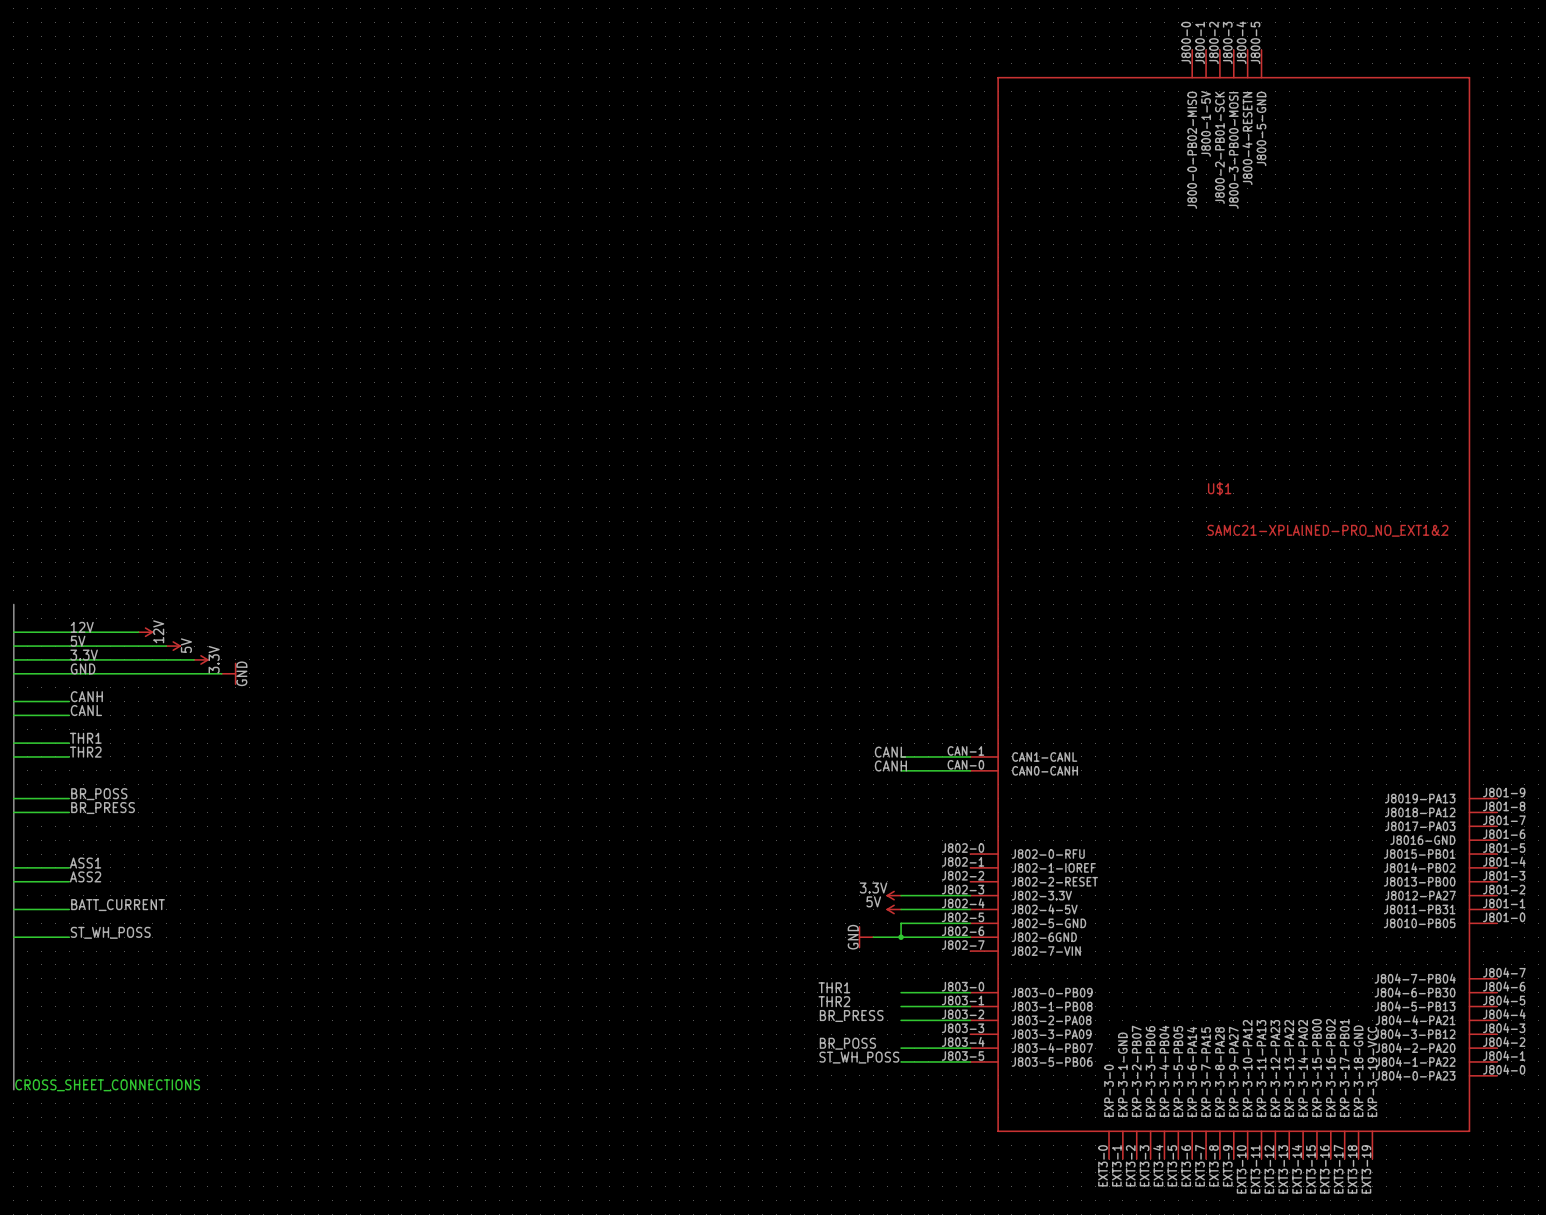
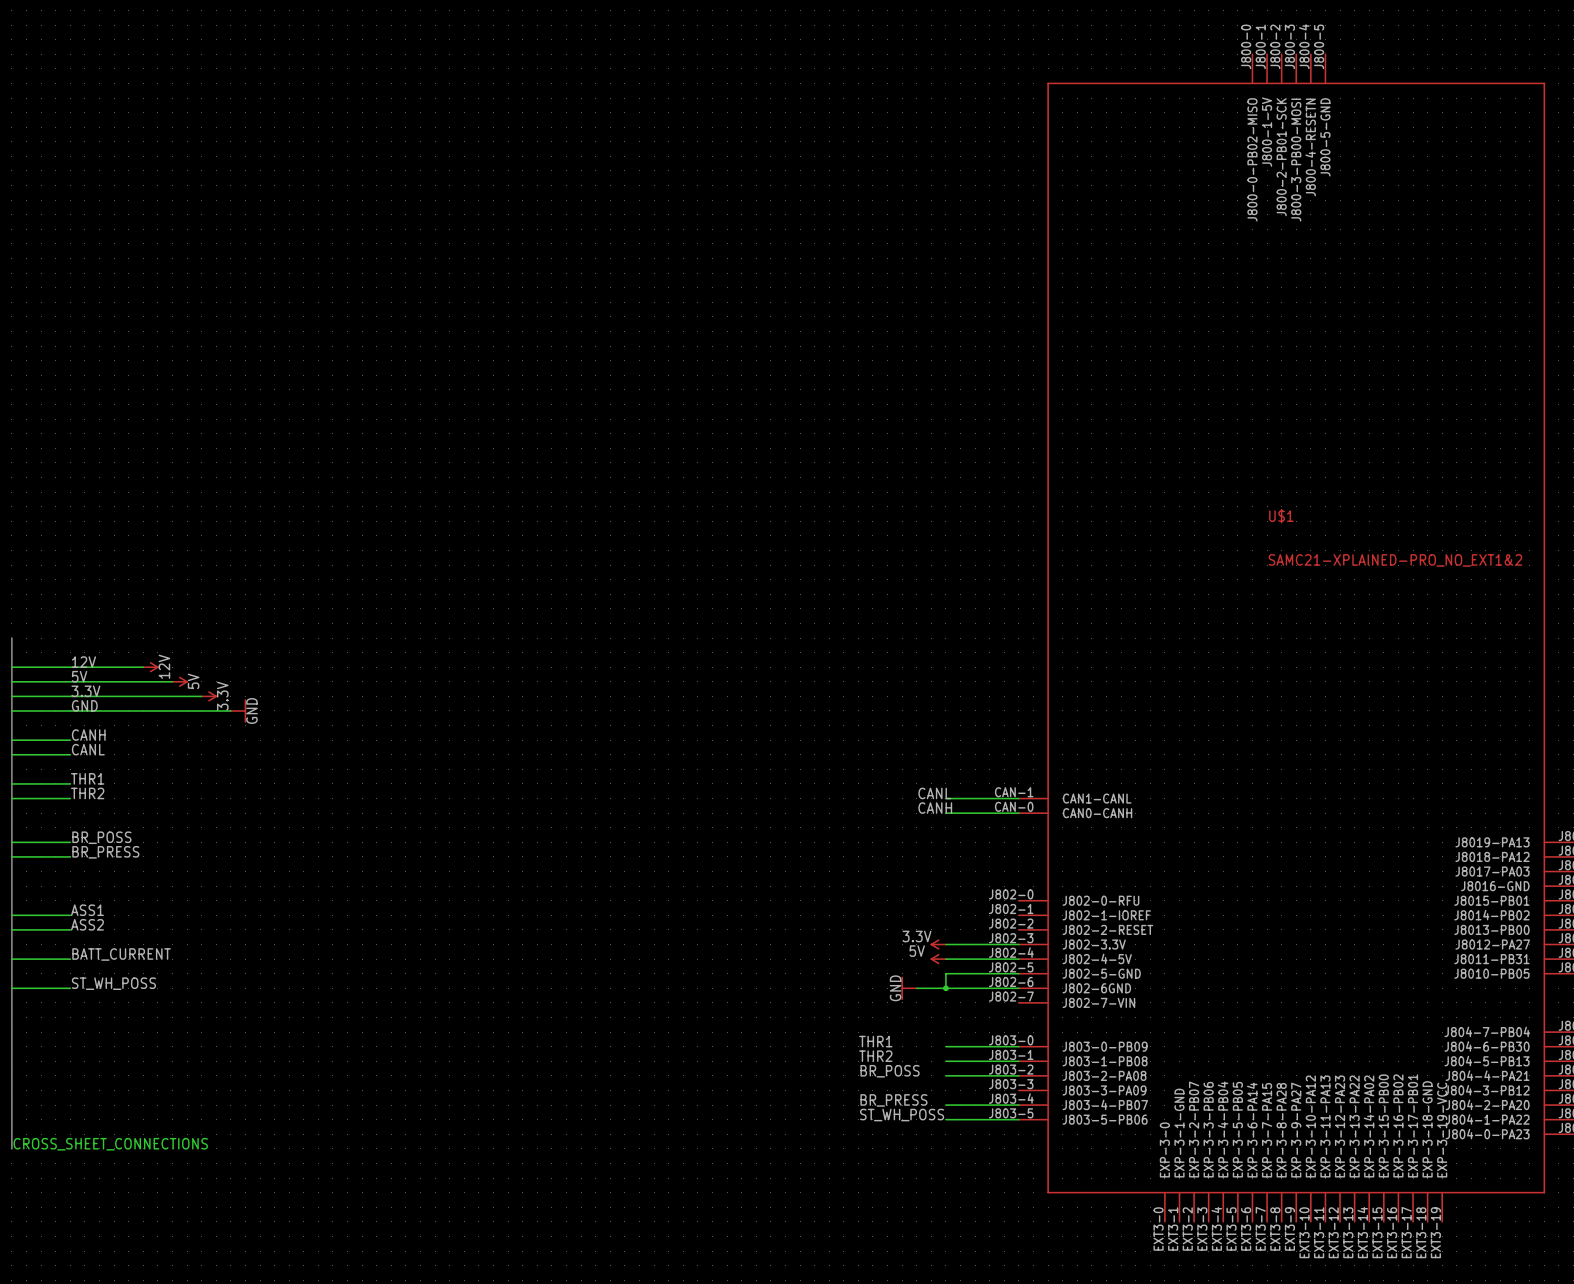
label: BR_PRESS (851, 1015) -> BR_POSS (890, 1071)
label: BR_POSS (847, 1043) -> BR_PRESS (893, 1100)

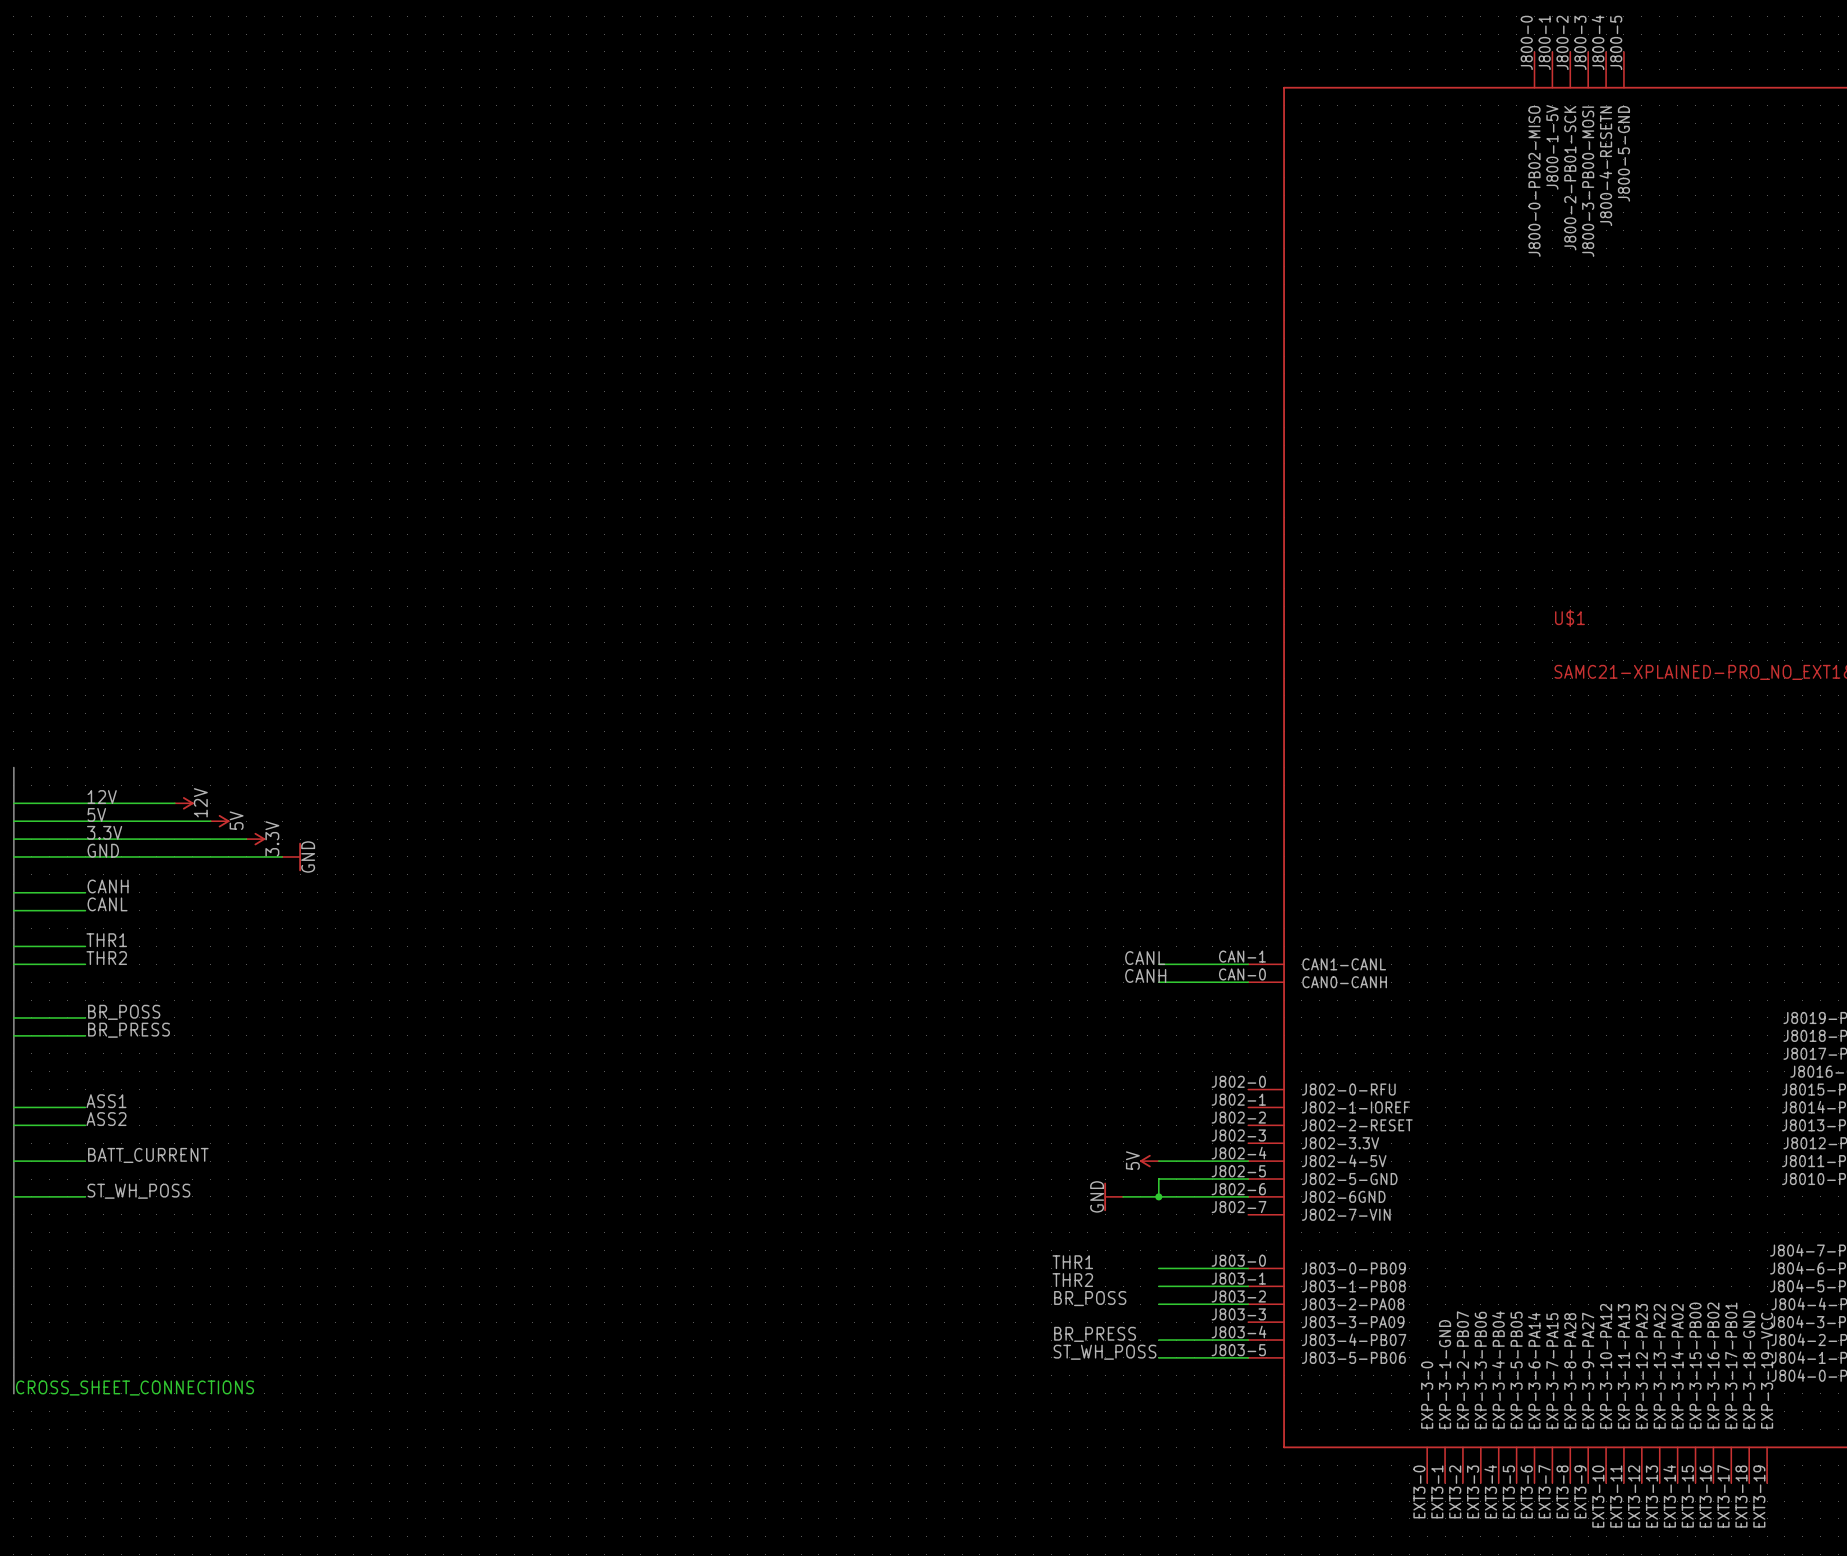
power symbol: 3.3V (938, 944) -> none
wire: (945, 944) (1018, 944) -> none
power symbol text rotation: 0° (917, 951) -> 90° counterclockwise (1132, 1160)

